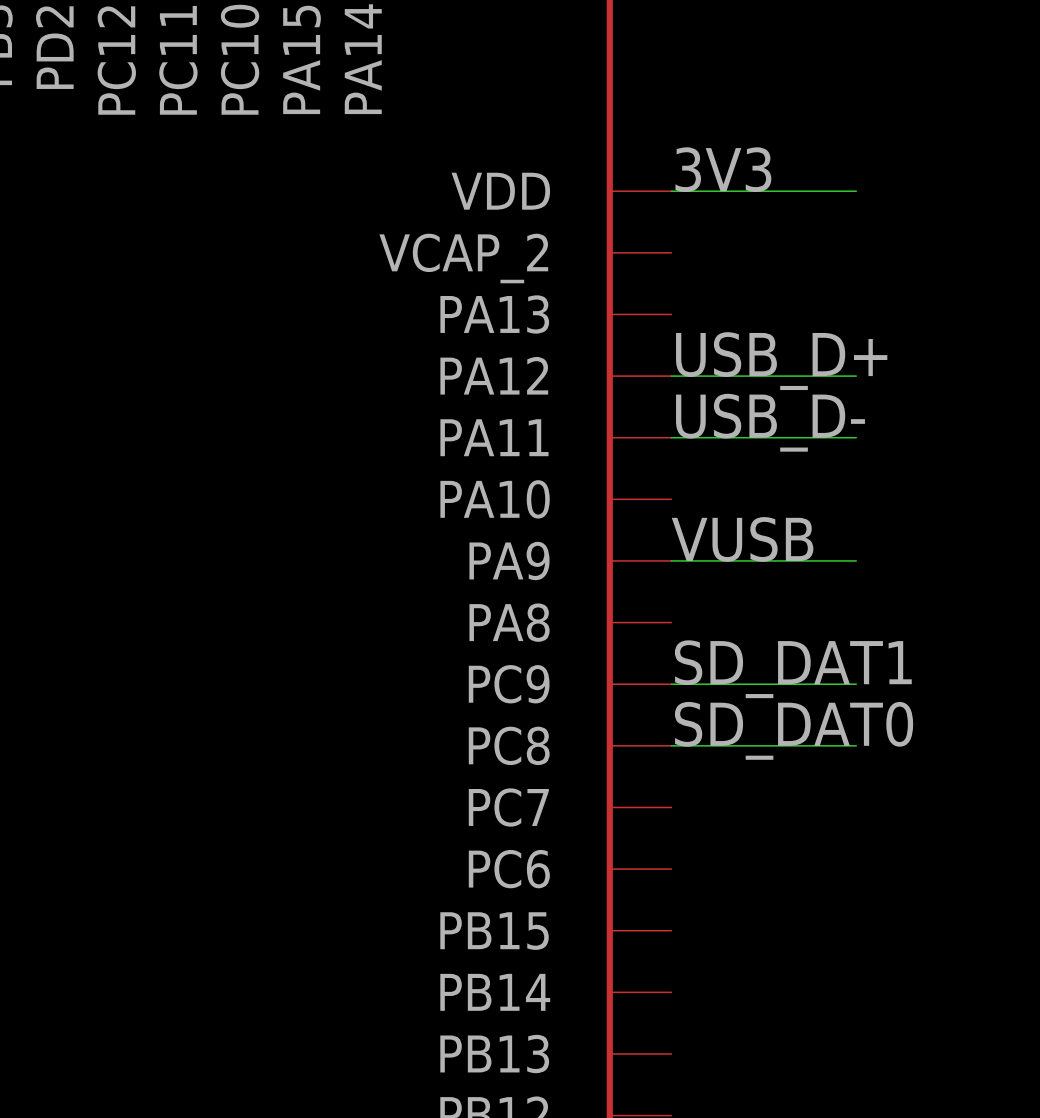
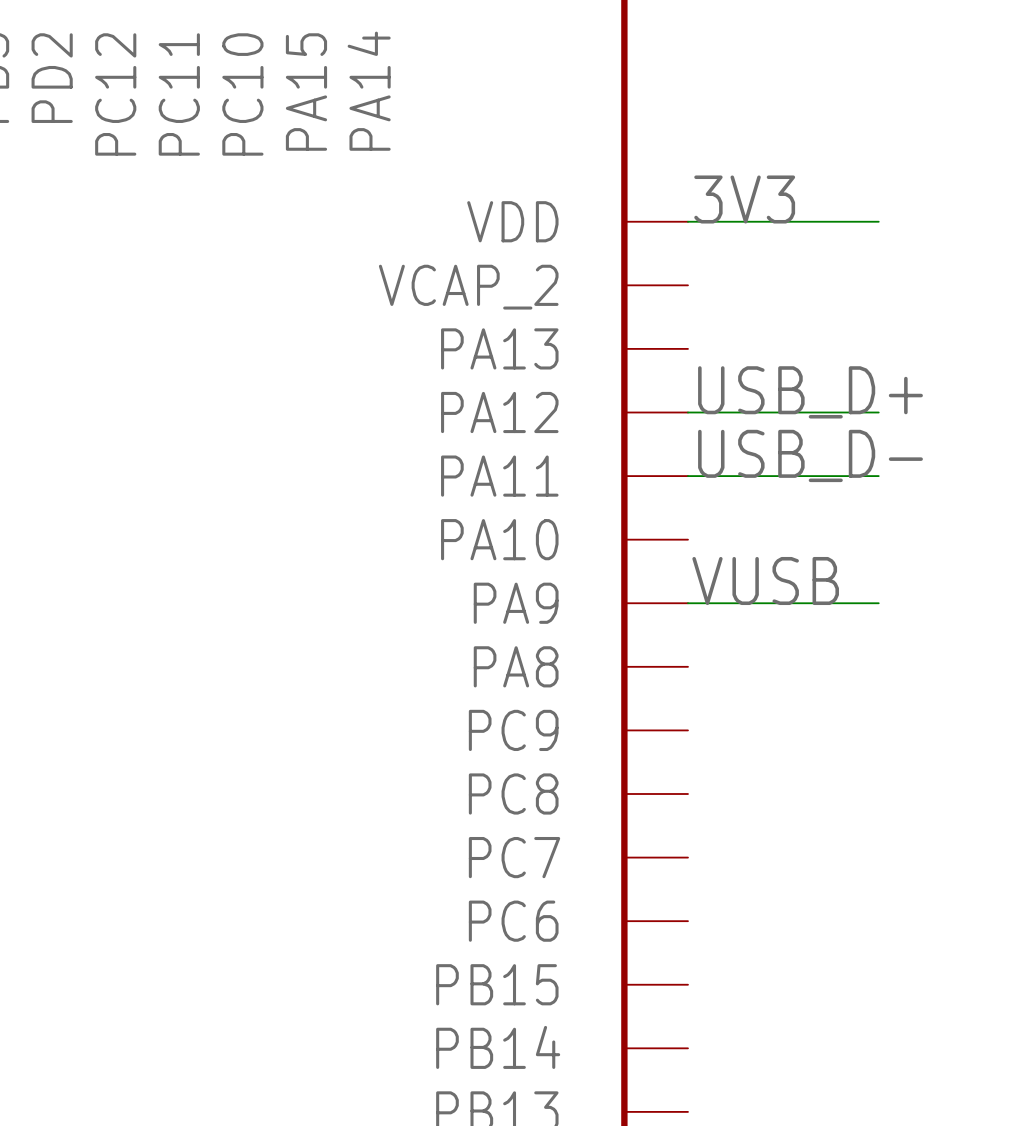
label: SD_DAT1 (793, 669) -> none
wire: (671, 684) (856, 684) -> none
label: SD_DAT0 (794, 730) -> none
wire: (671, 745) (856, 745) -> none

